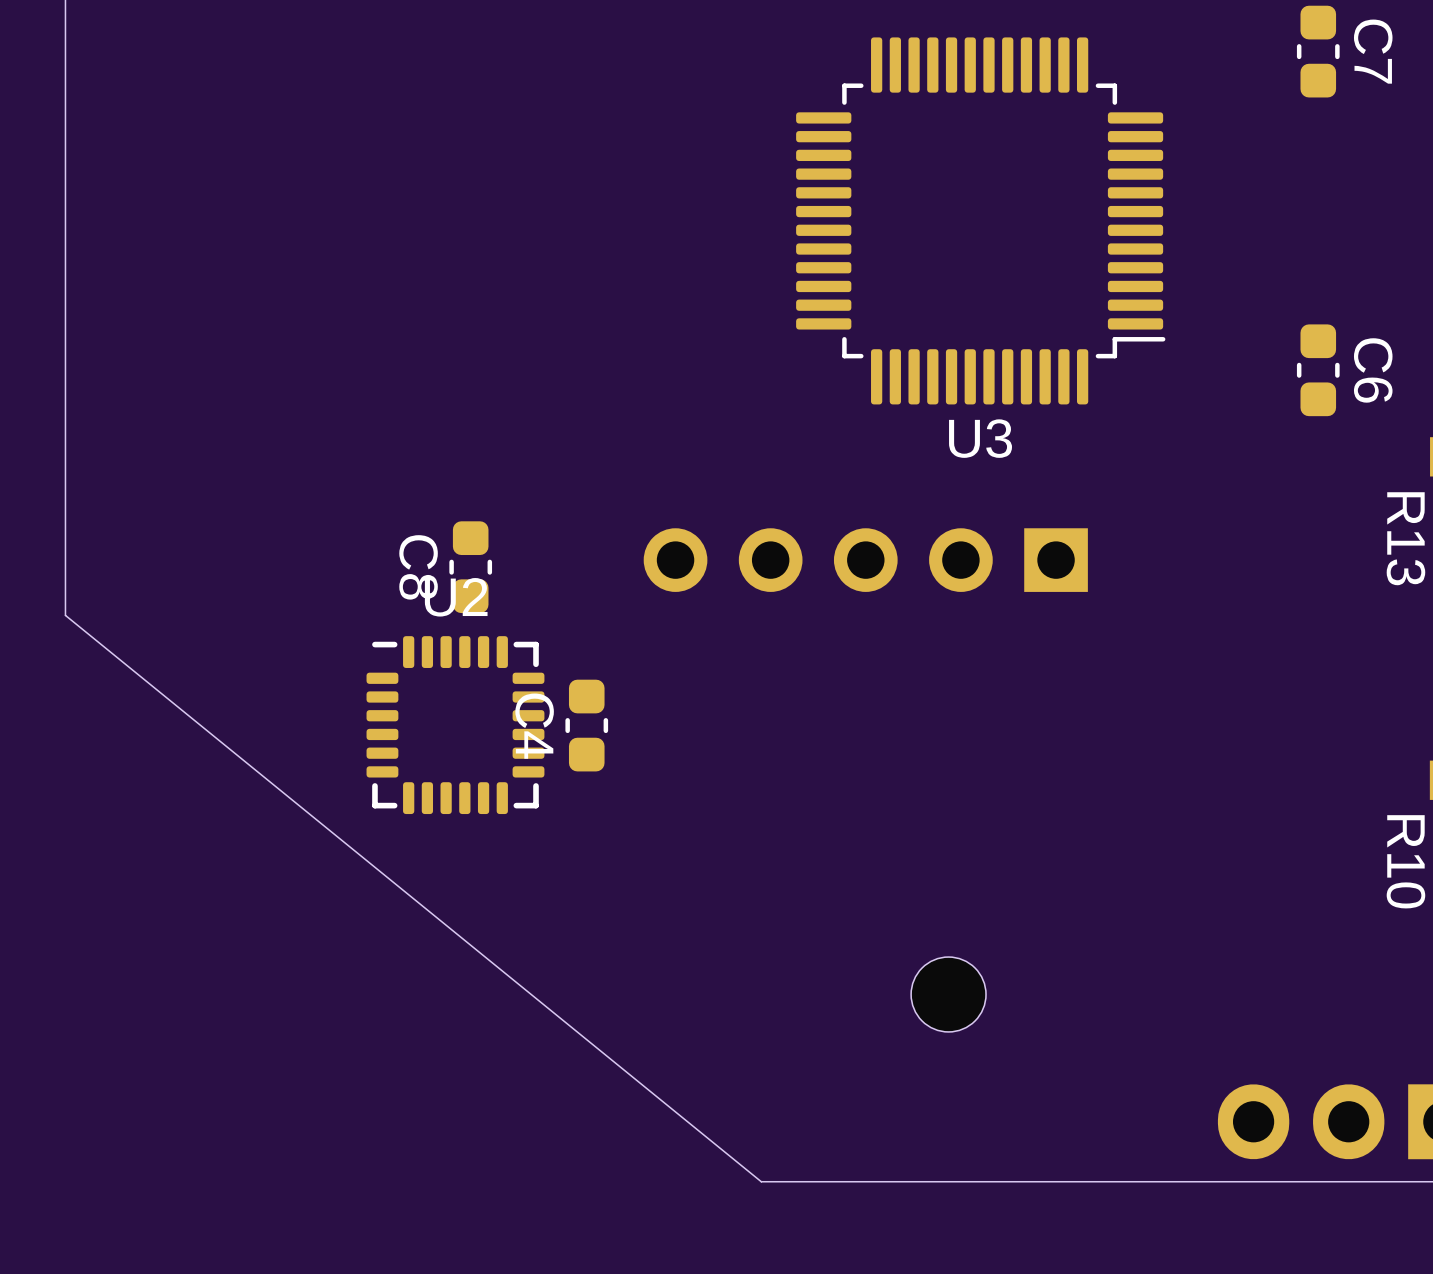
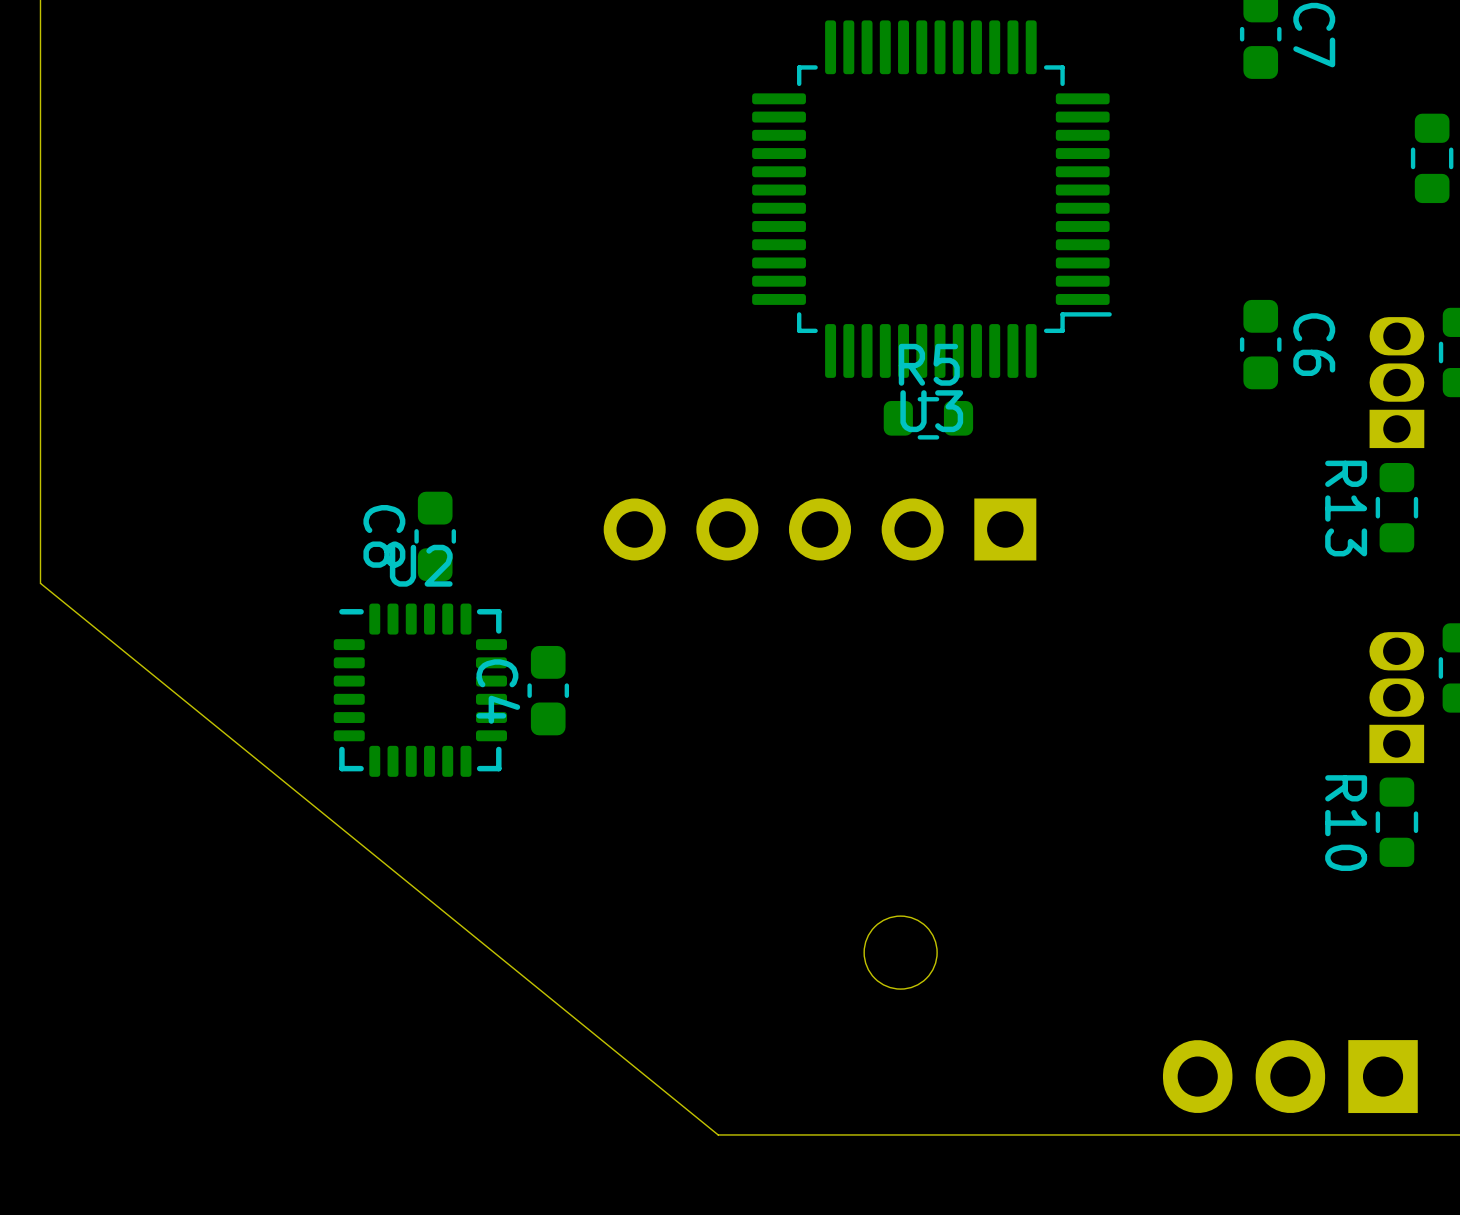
R5: none -> (928, 418)

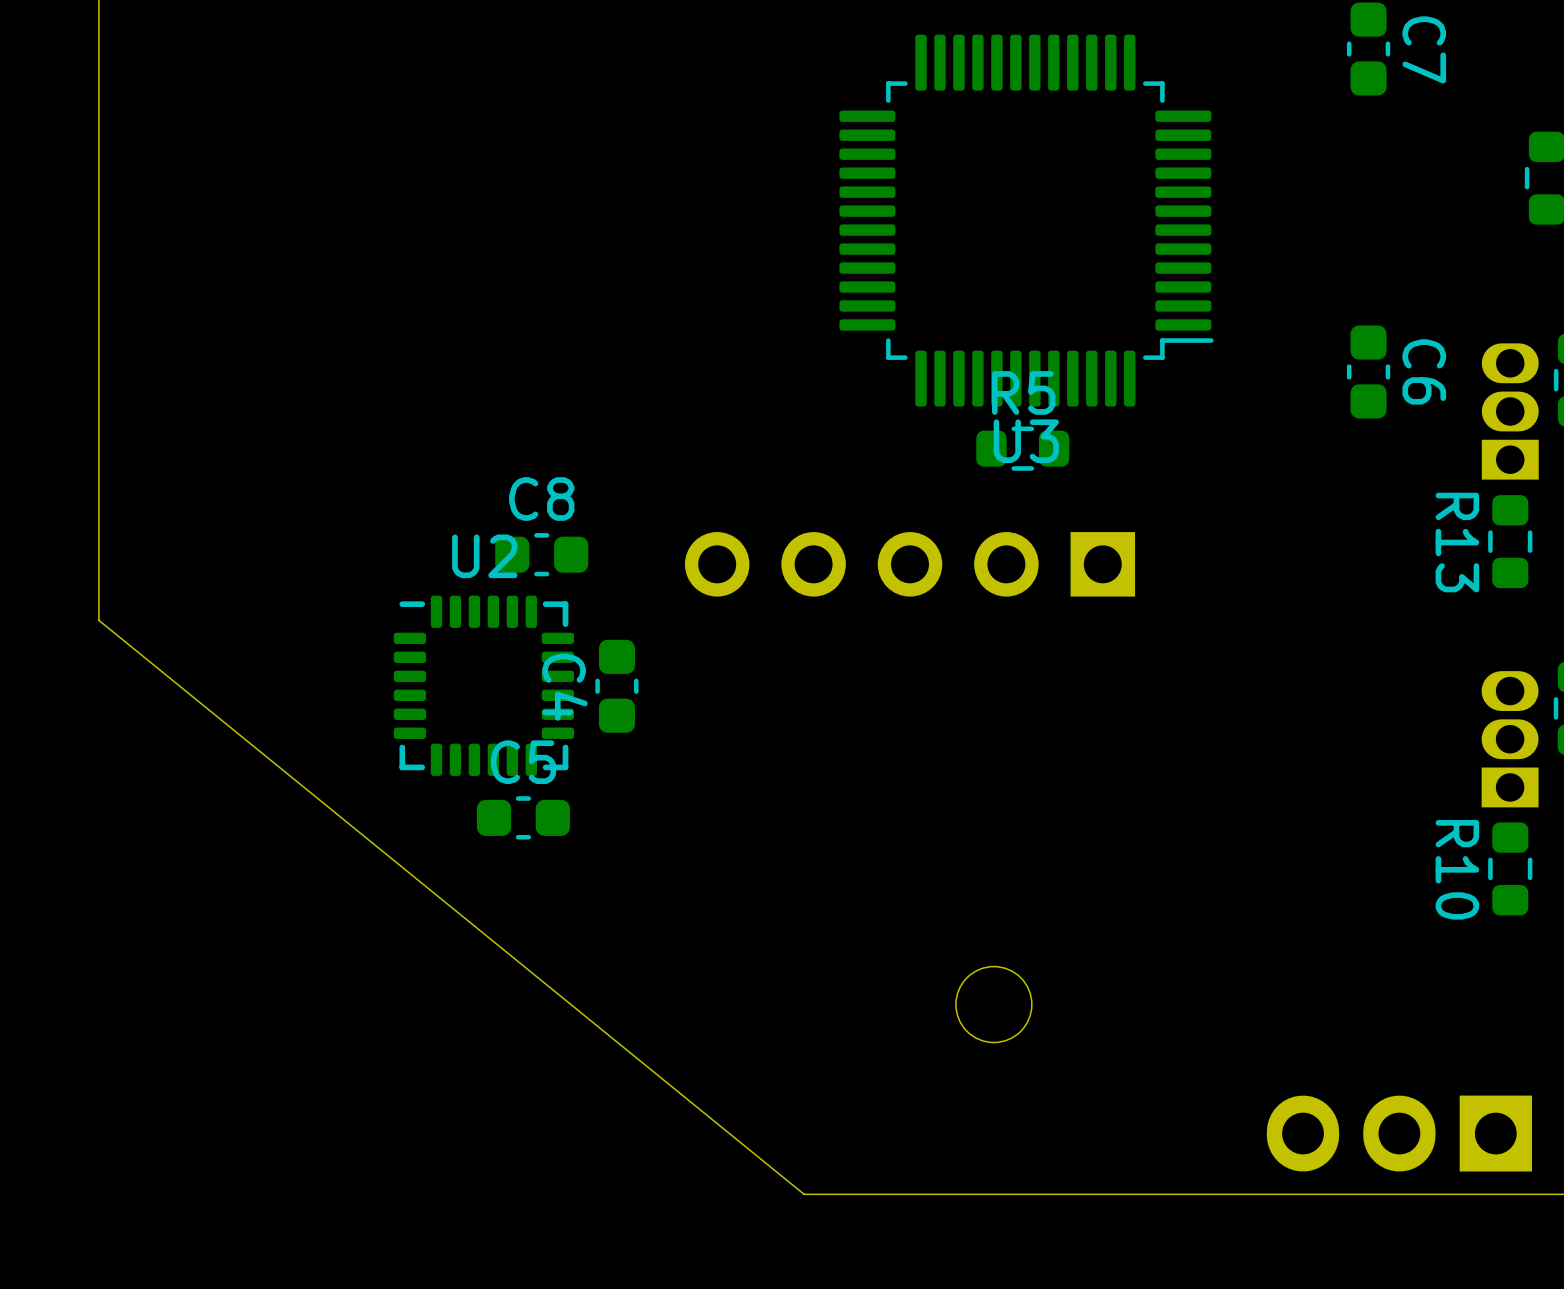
C8 rotation: 0° (435, 536) -> 90° clockwise (541, 554)
U2 position: (420, 690) -> (483, 685)
C4 position: (548, 690) -> (616, 686)
C5: none -> (523, 817)

